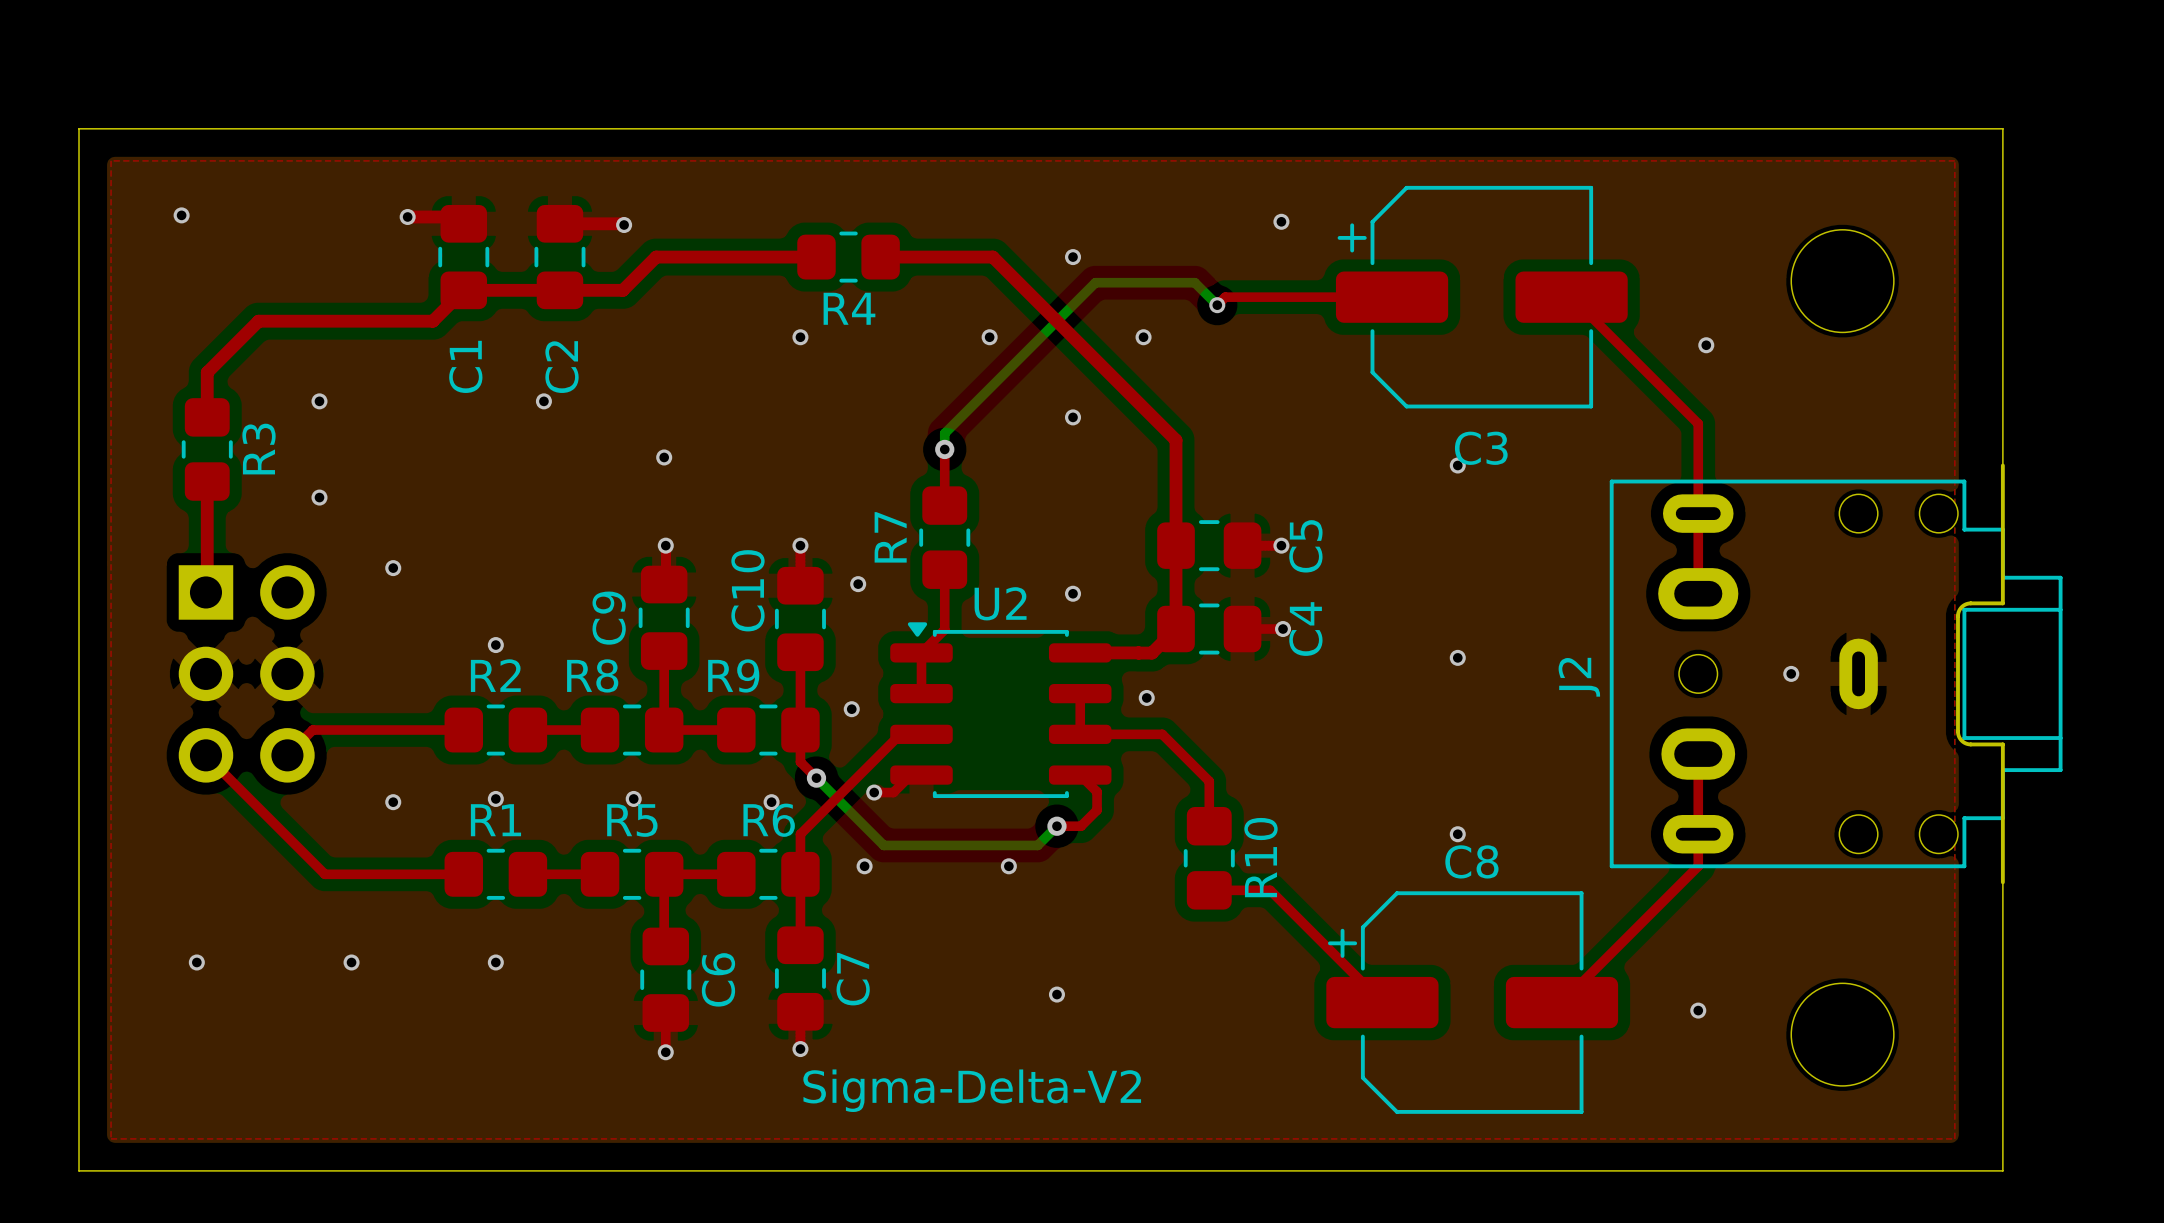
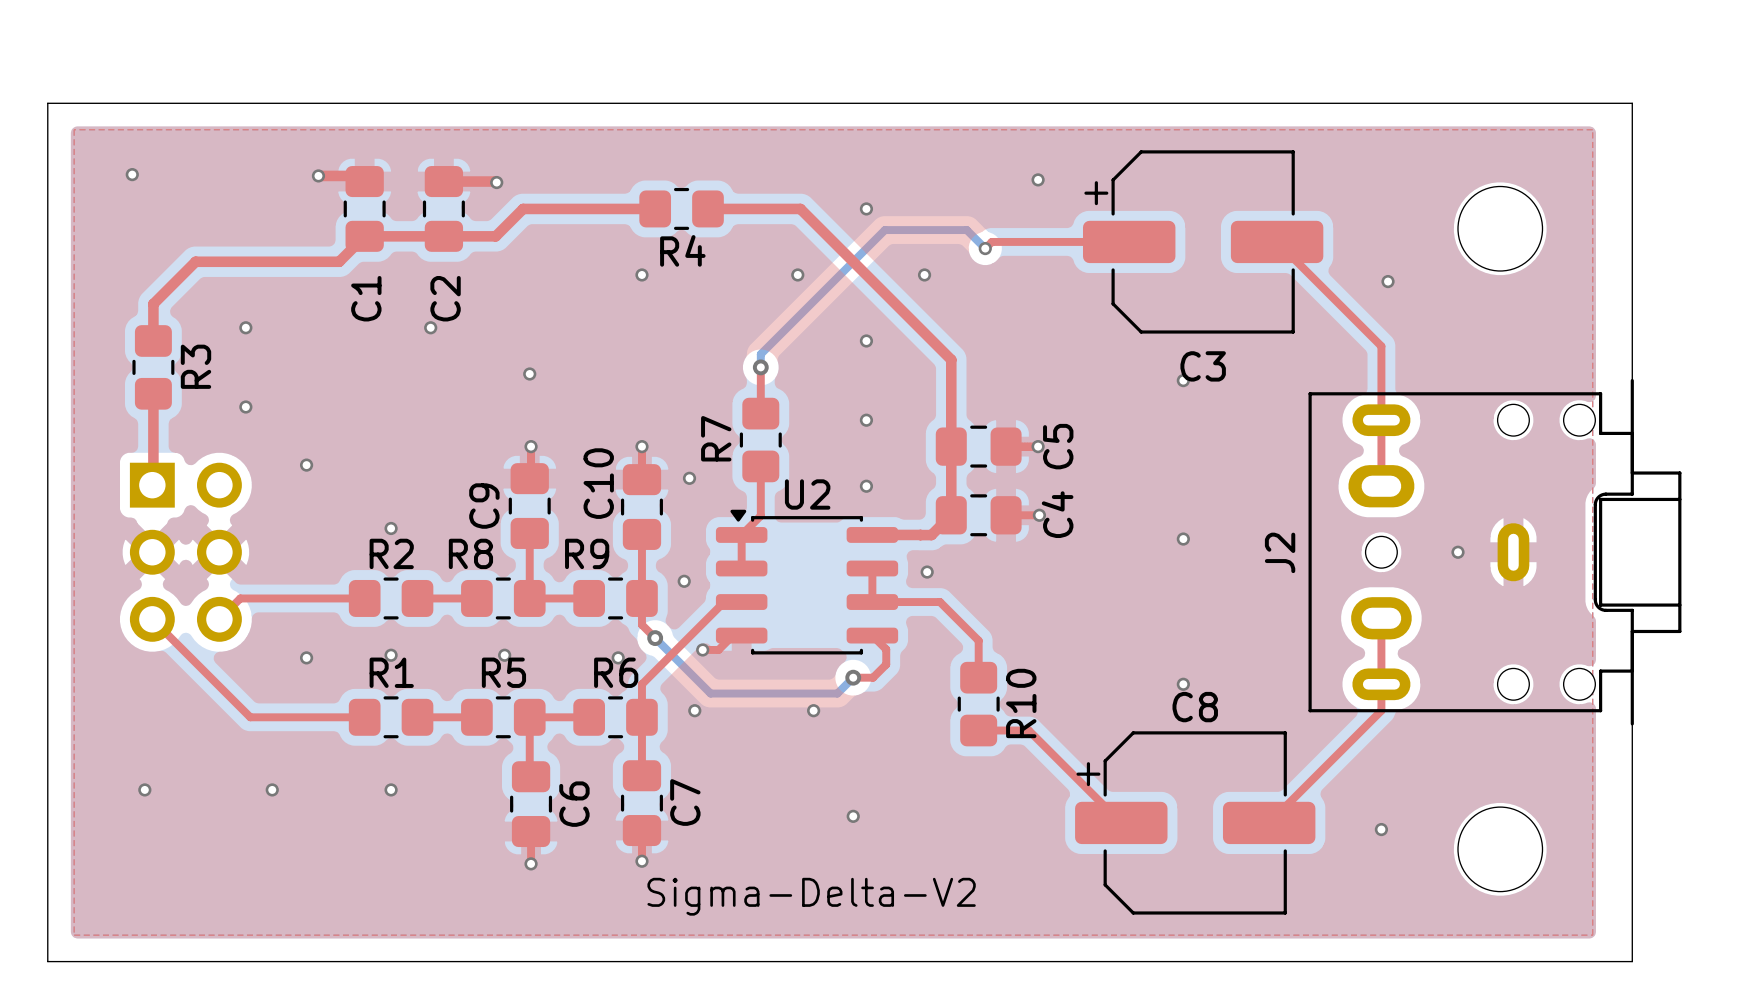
via: none -> (866, 420)

